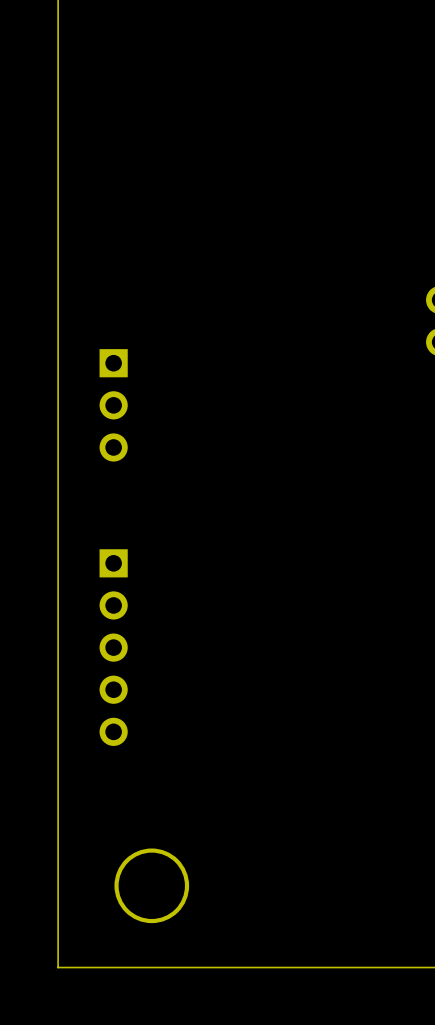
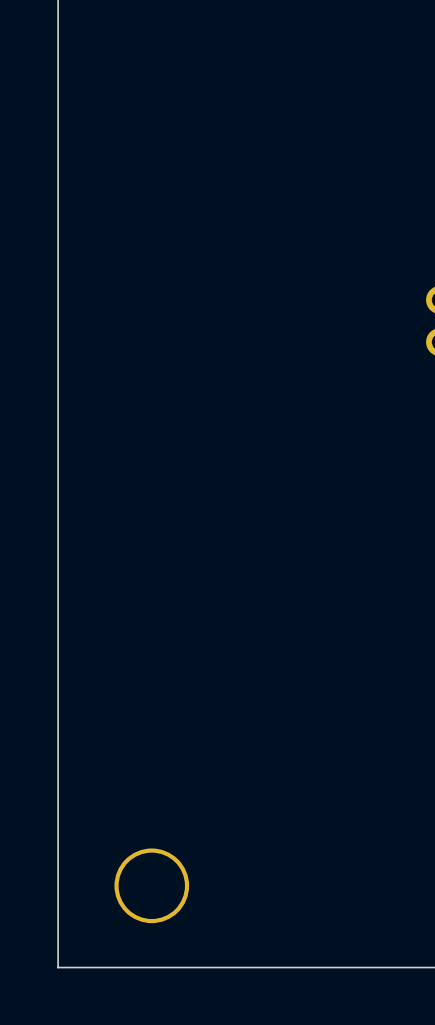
part: (113, 405) -> none
part: (113, 647) -> none

